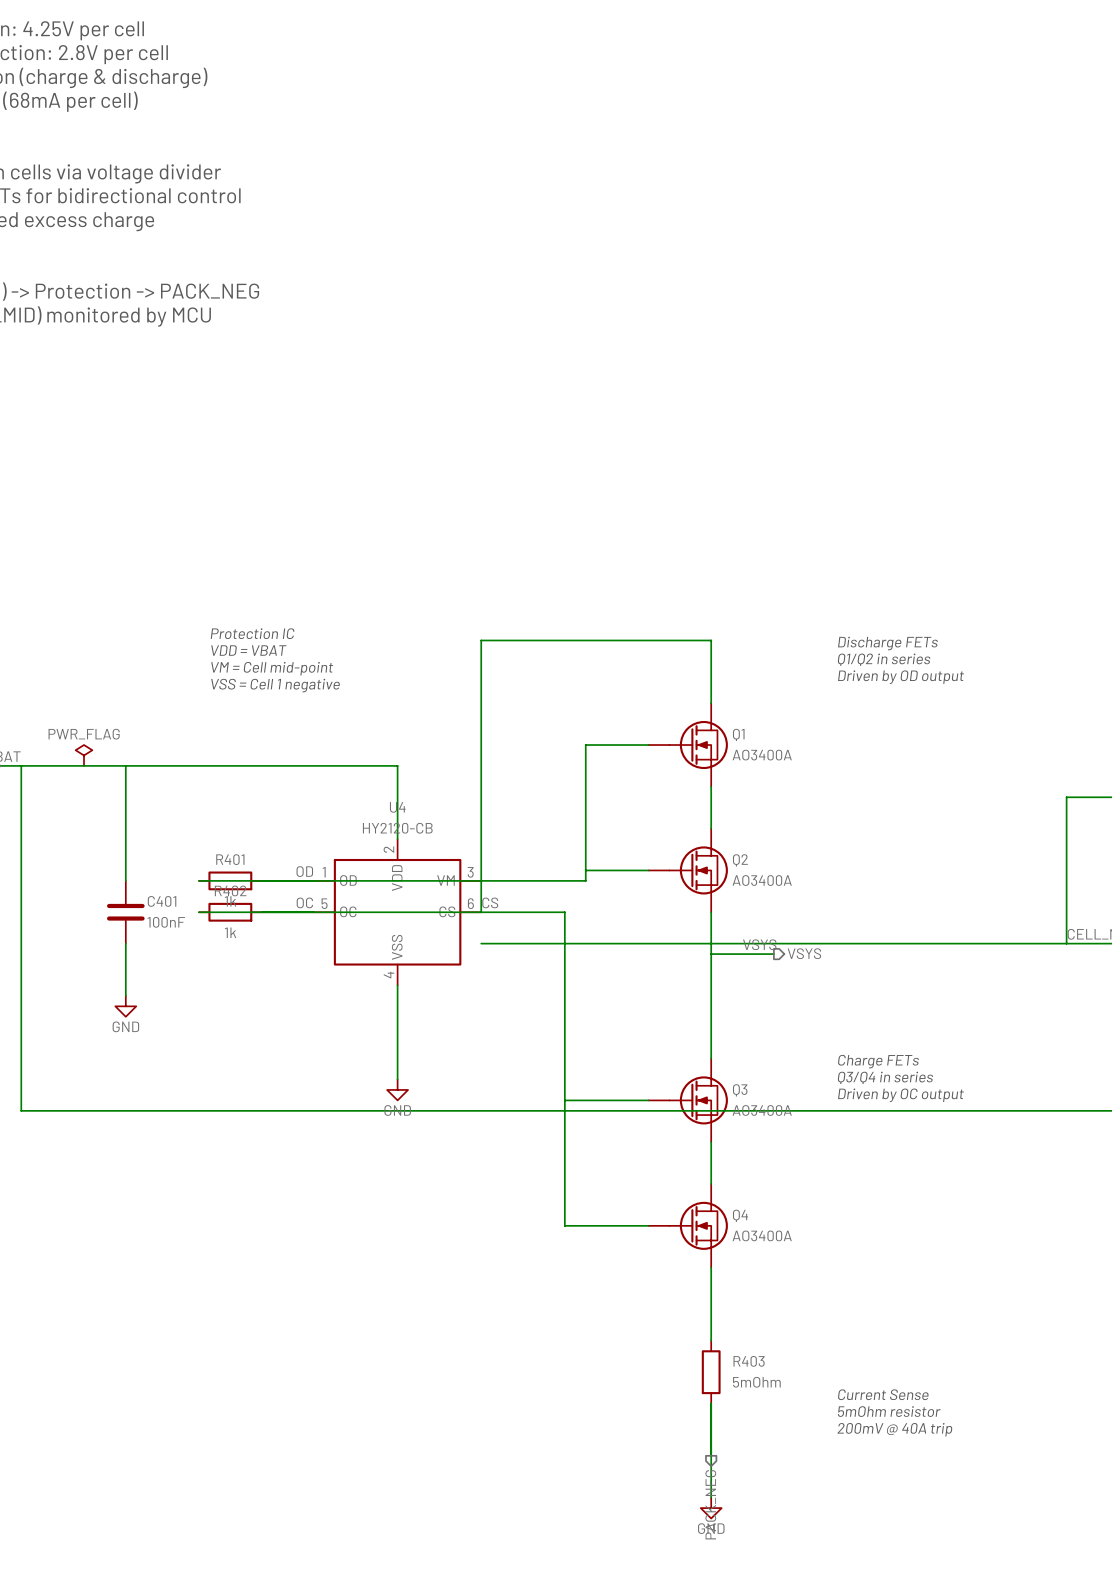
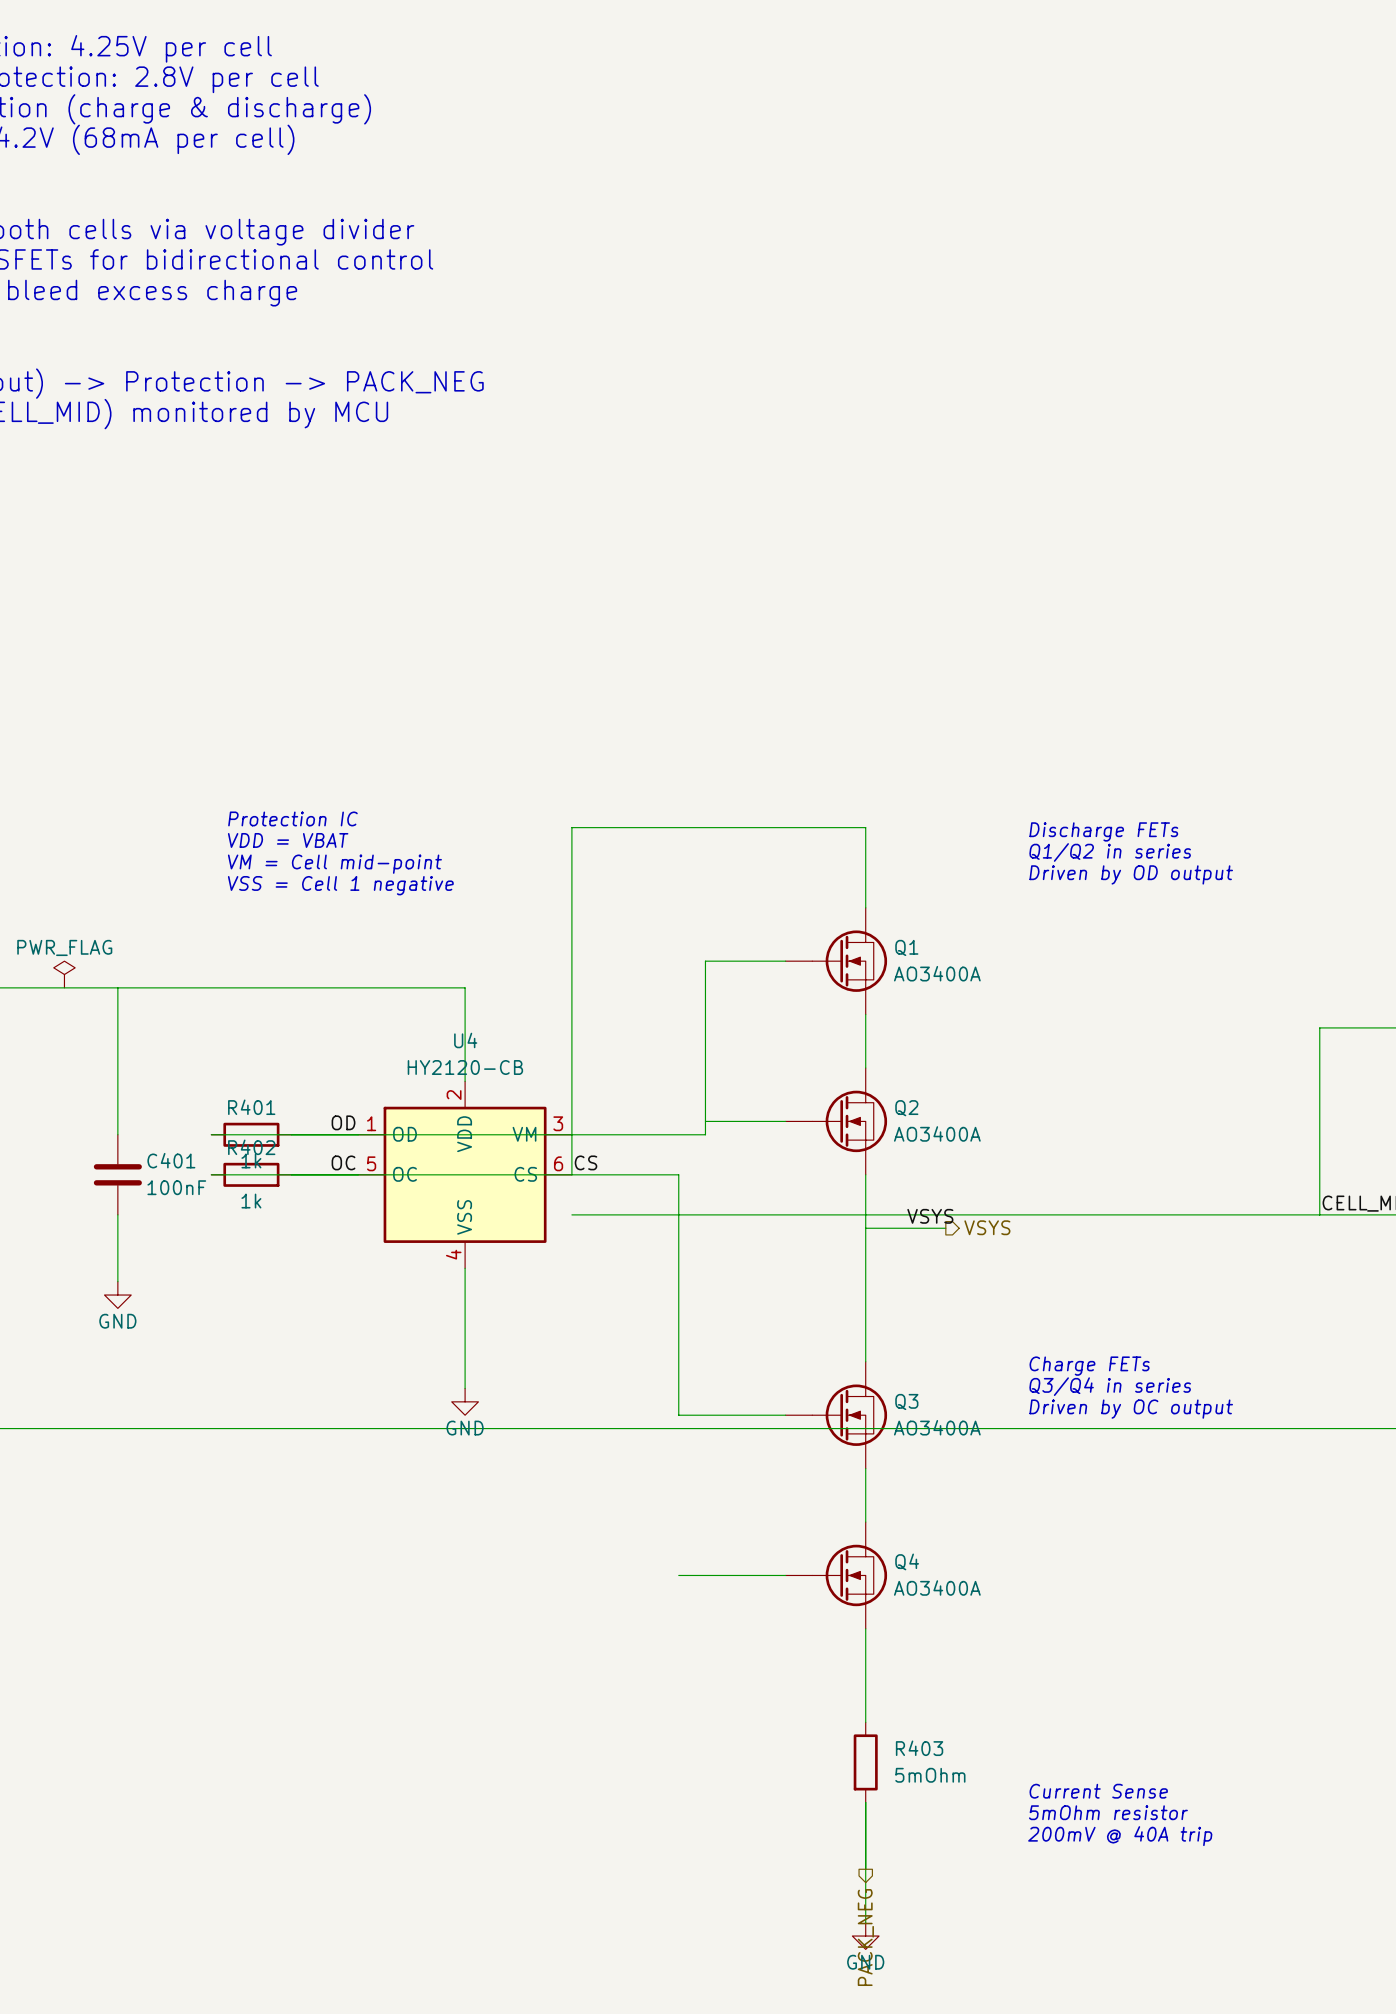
wire: (564, 1100) (564, 1225) -> none

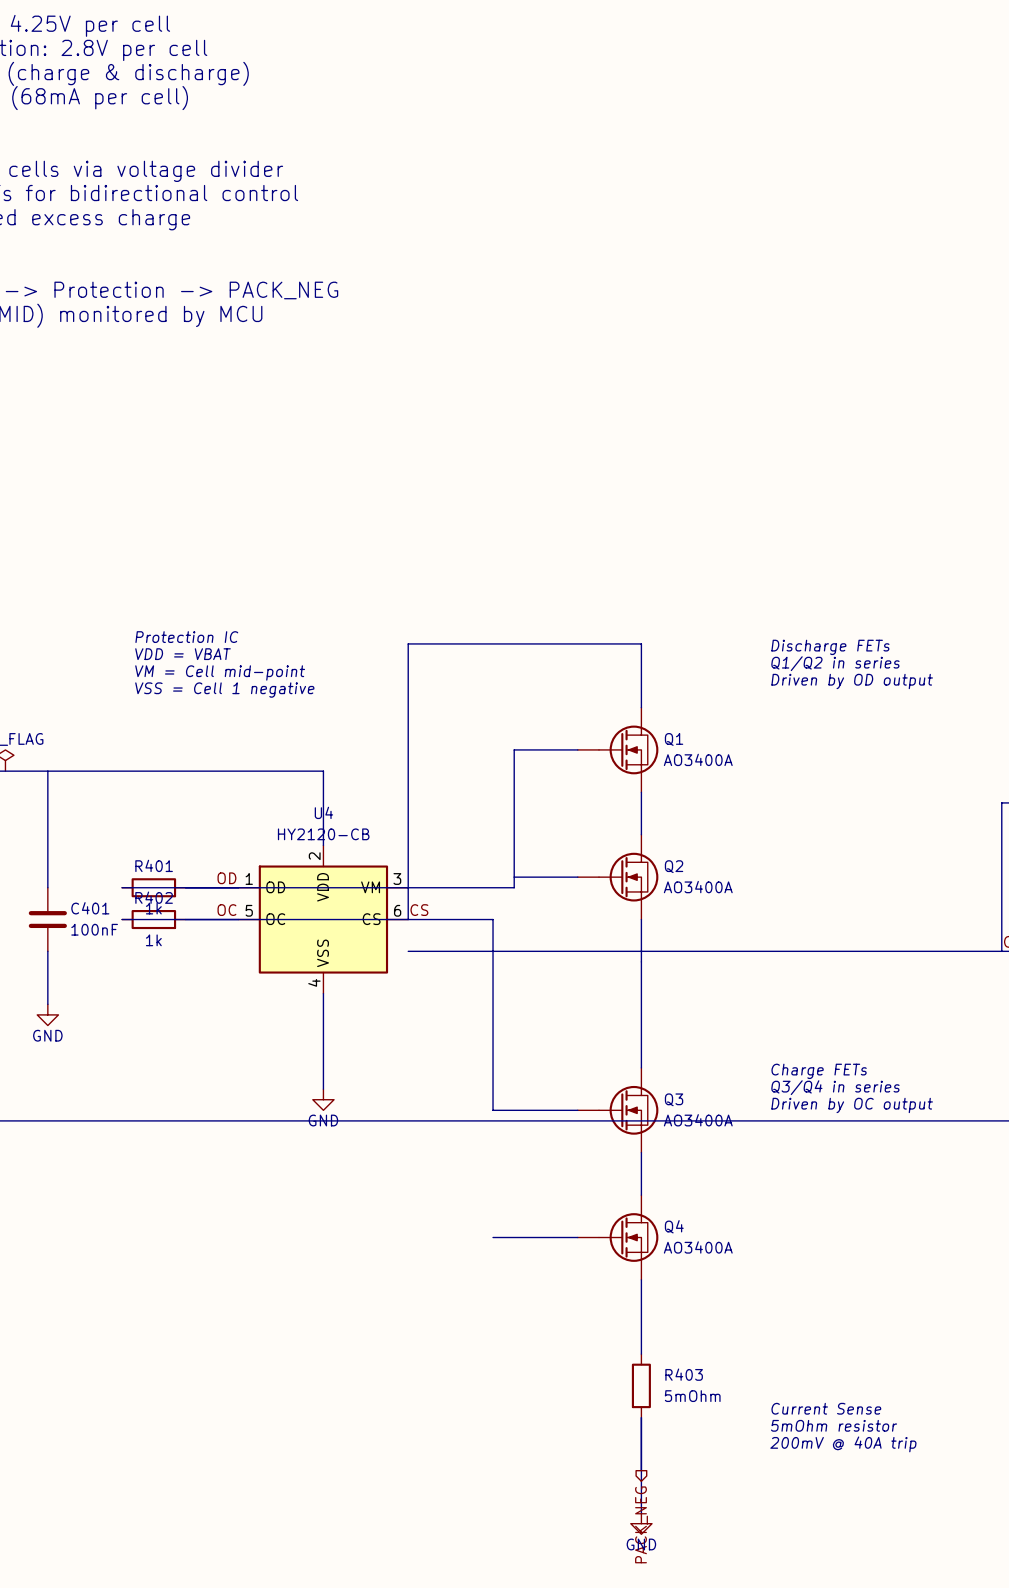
label: VSYS (930, 1216) -> none
hierarchical label: VSYS (987, 1227) -> none
wire: (865, 1228) (945, 1228) -> none

